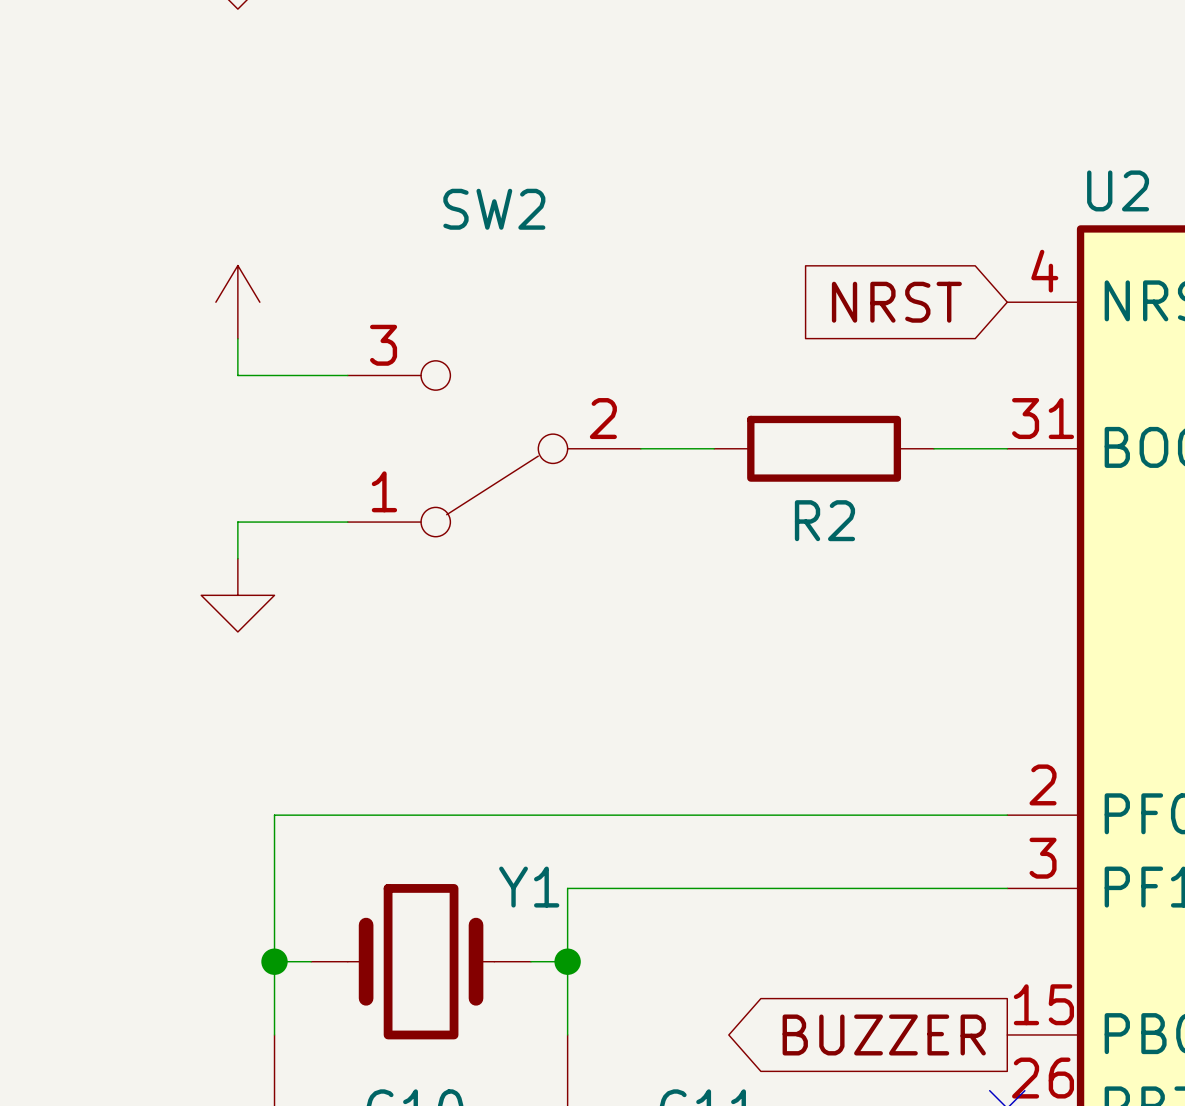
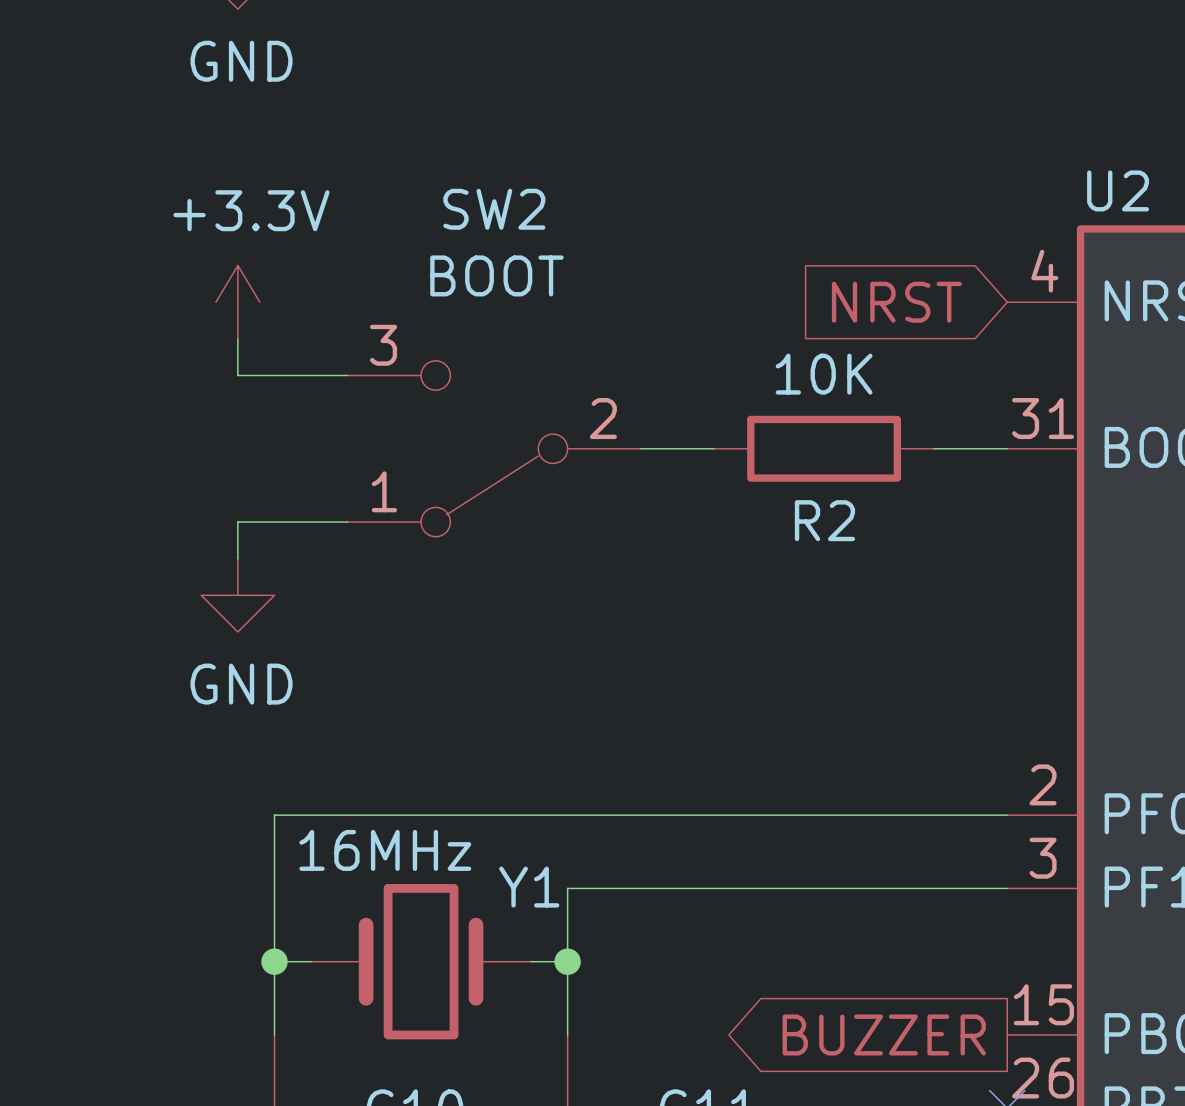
power symbol text: none -> GND (241, 61)
power symbol text: none -> +3.3V (251, 210)
SW2 value: none -> BOOT (496, 275)
R2 value: none -> 10K (824, 374)
power symbol text: none -> GND (241, 684)
Y1 value: none -> 16MHz (385, 850)

